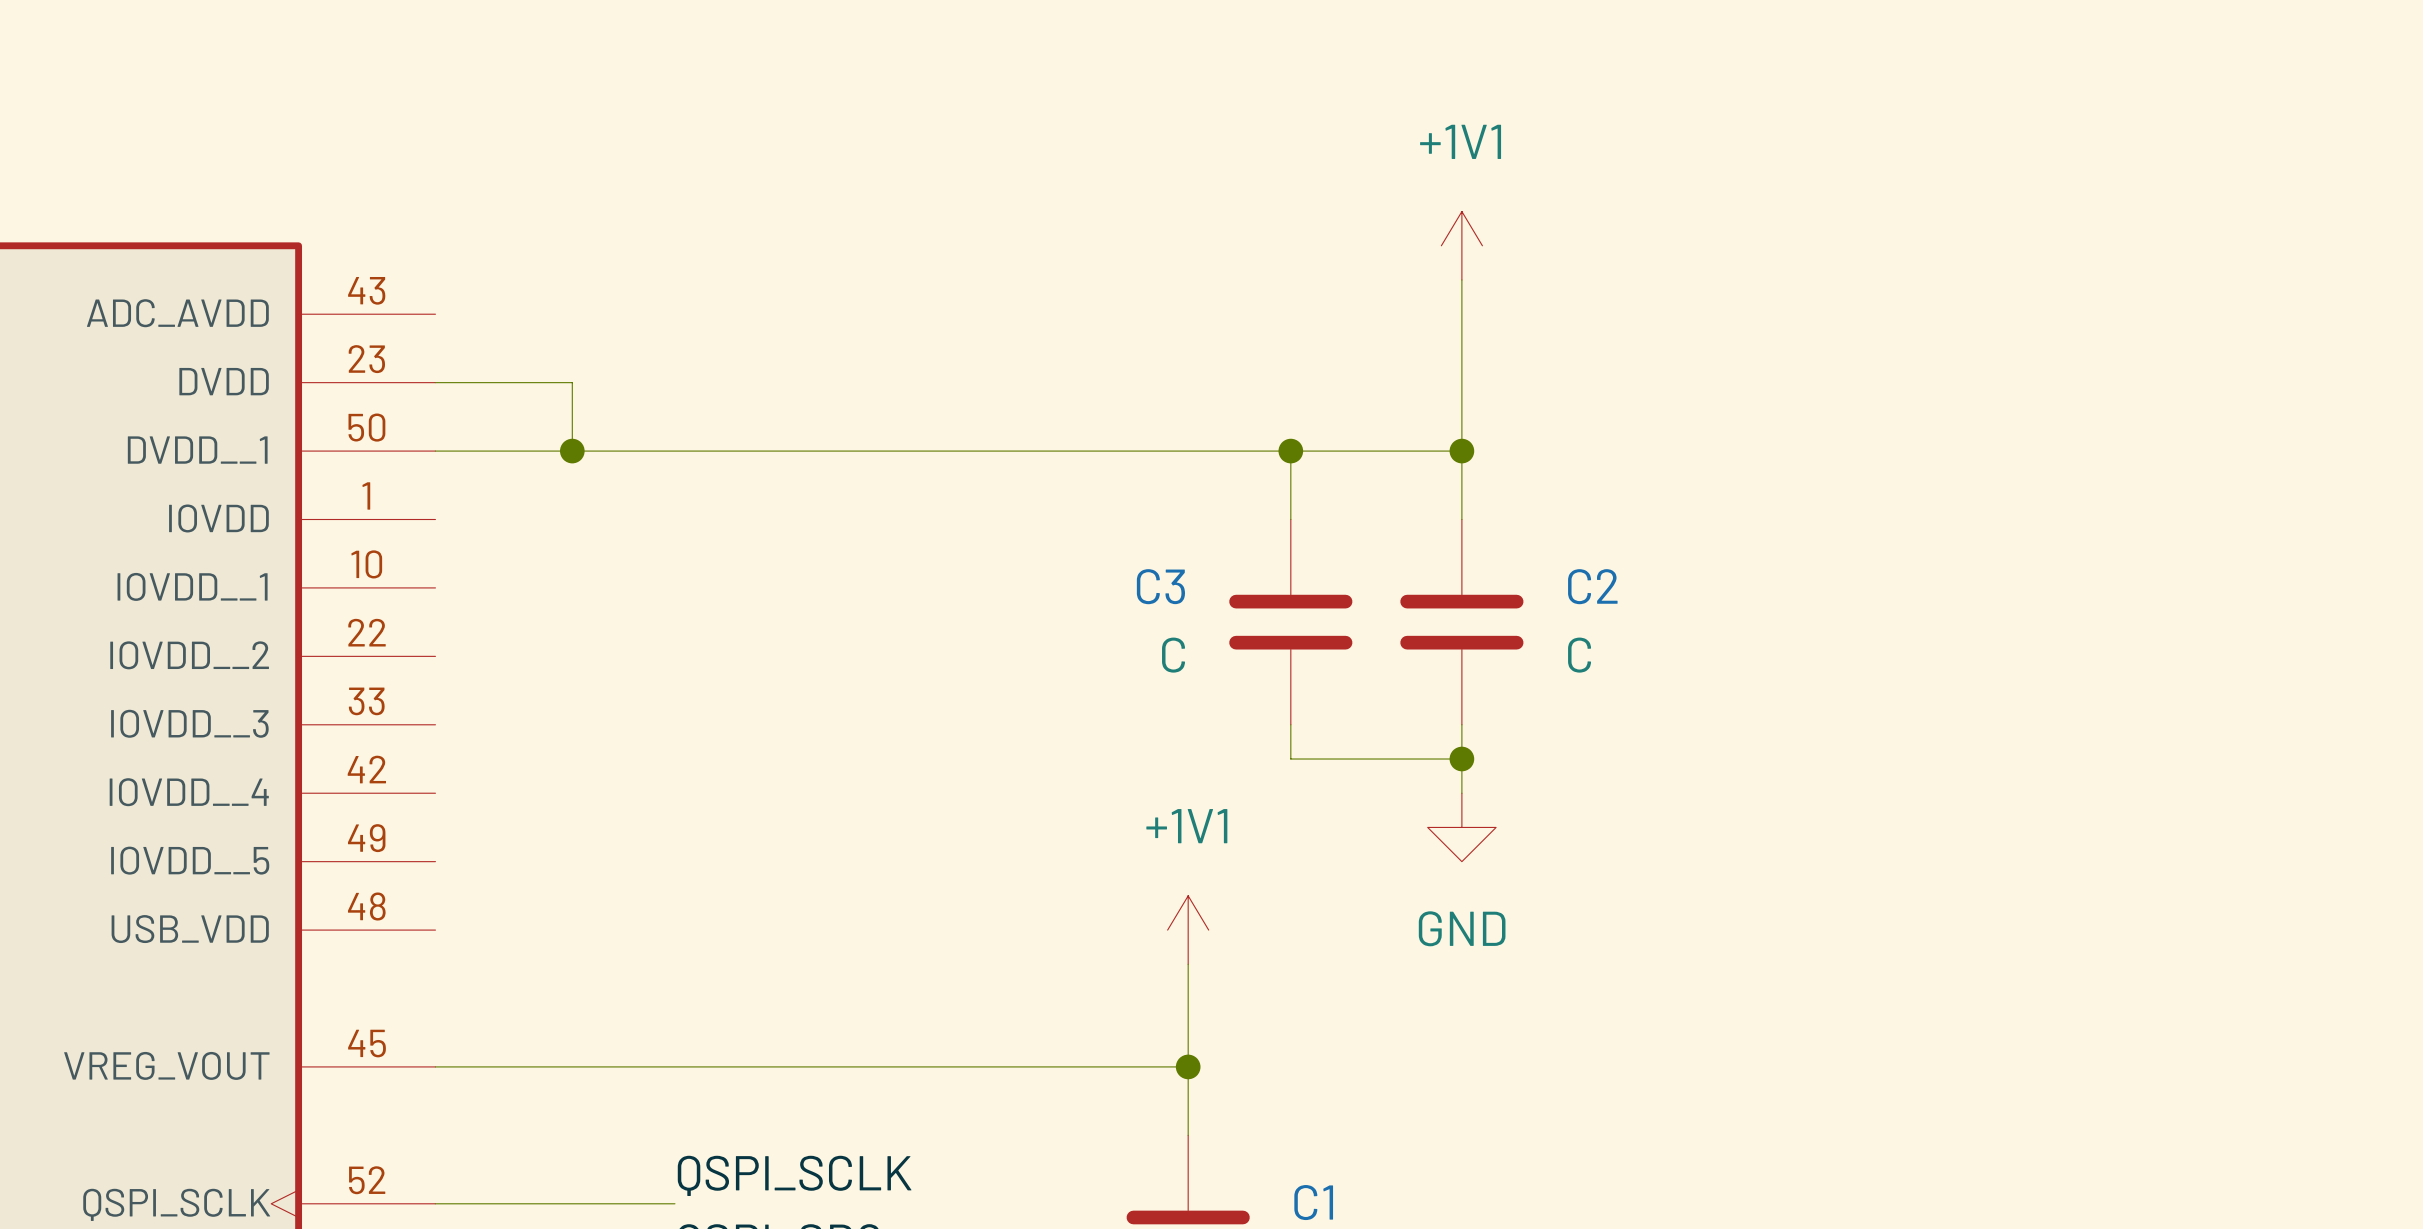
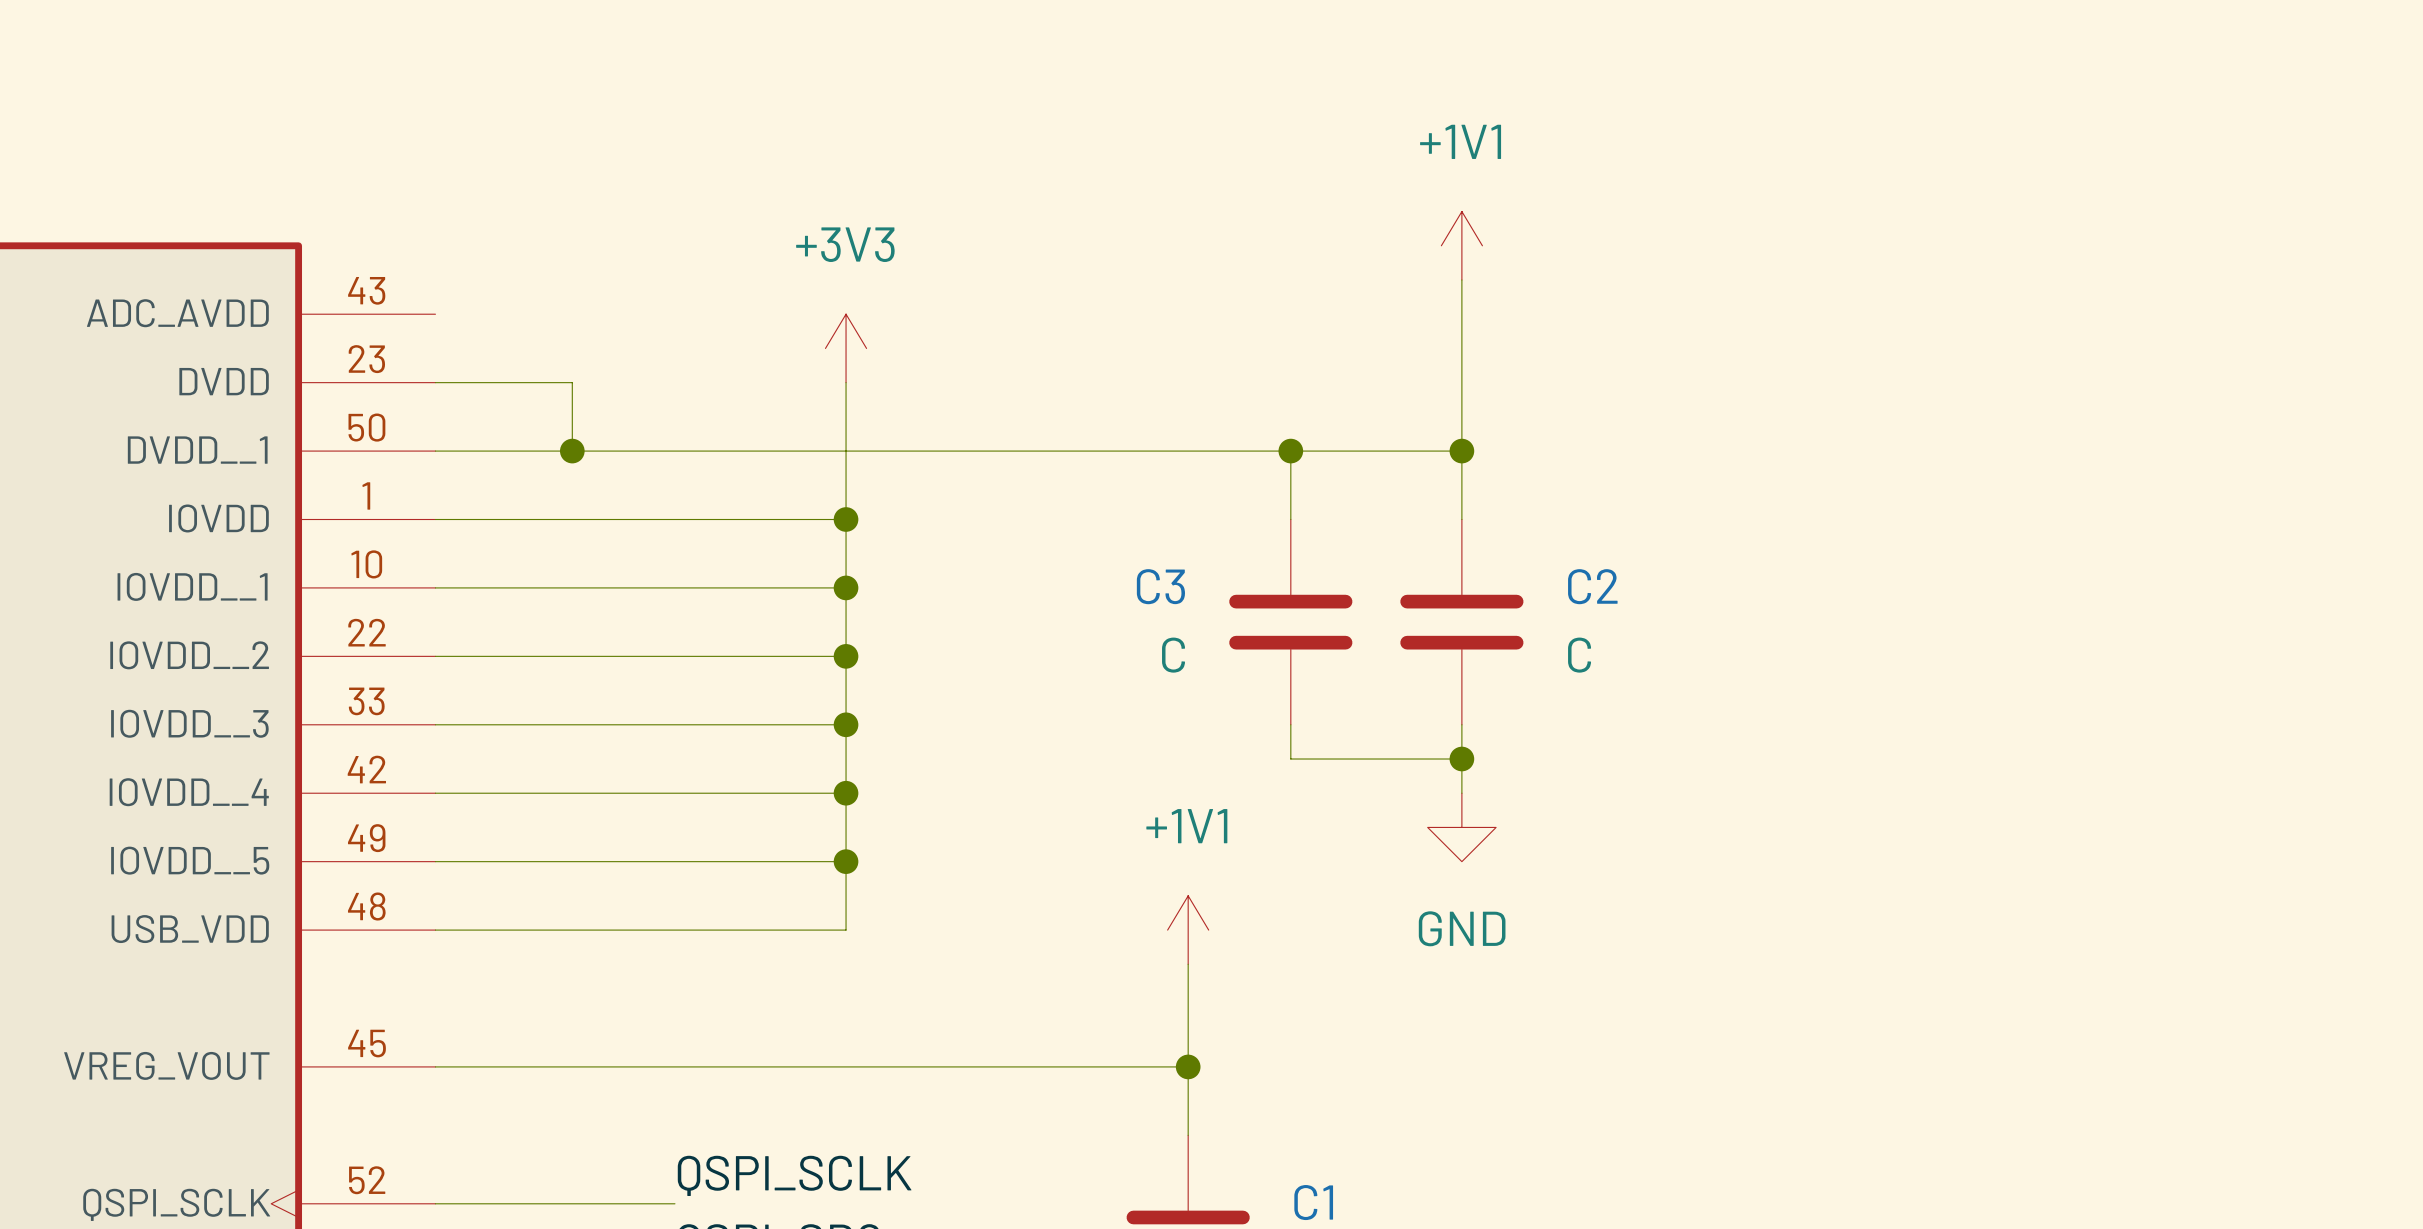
power symbol: none -> +3V3 (846, 348)
wire: none -> (846, 382) (846, 930) (435, 930)
wire: none -> (435, 519) (846, 519)
junction: none -> (846, 519)
wire: none -> (435, 587) (846, 587)
junction: none -> (846, 587)
wire: none -> (435, 656) (846, 656)
junction: none -> (846, 656)
wire: none -> (435, 724) (846, 724)
junction: none -> (846, 724)
wire: none -> (435, 793) (846, 793)
junction: none -> (846, 793)
wire: none -> (435, 861) (846, 861)
junction: none -> (846, 861)

